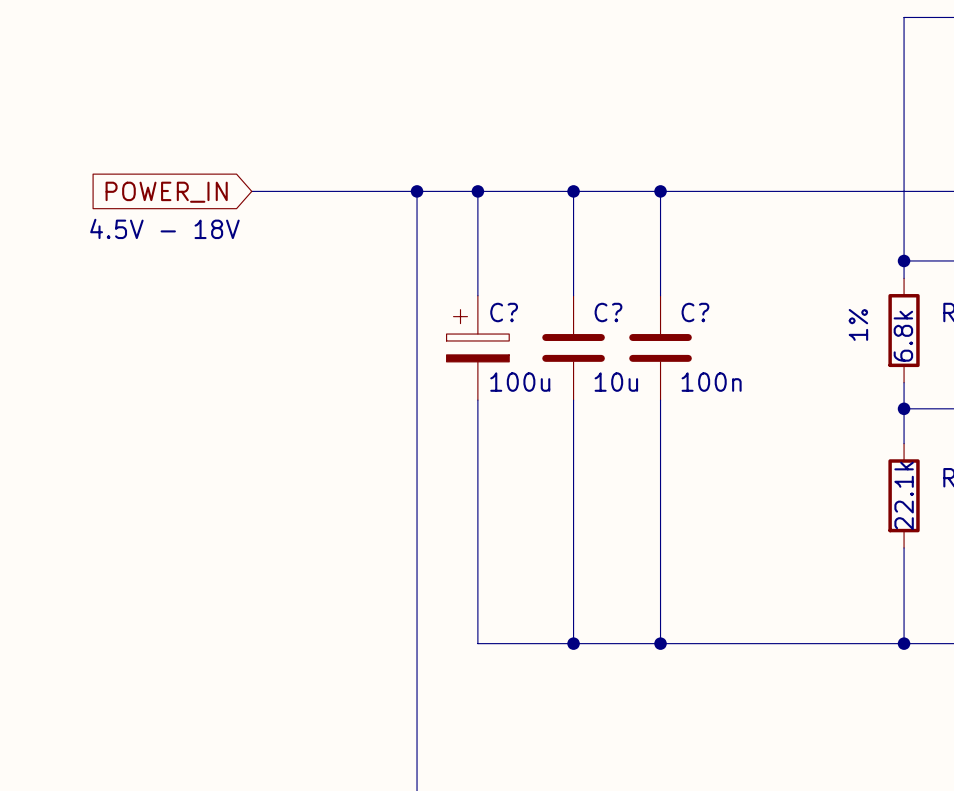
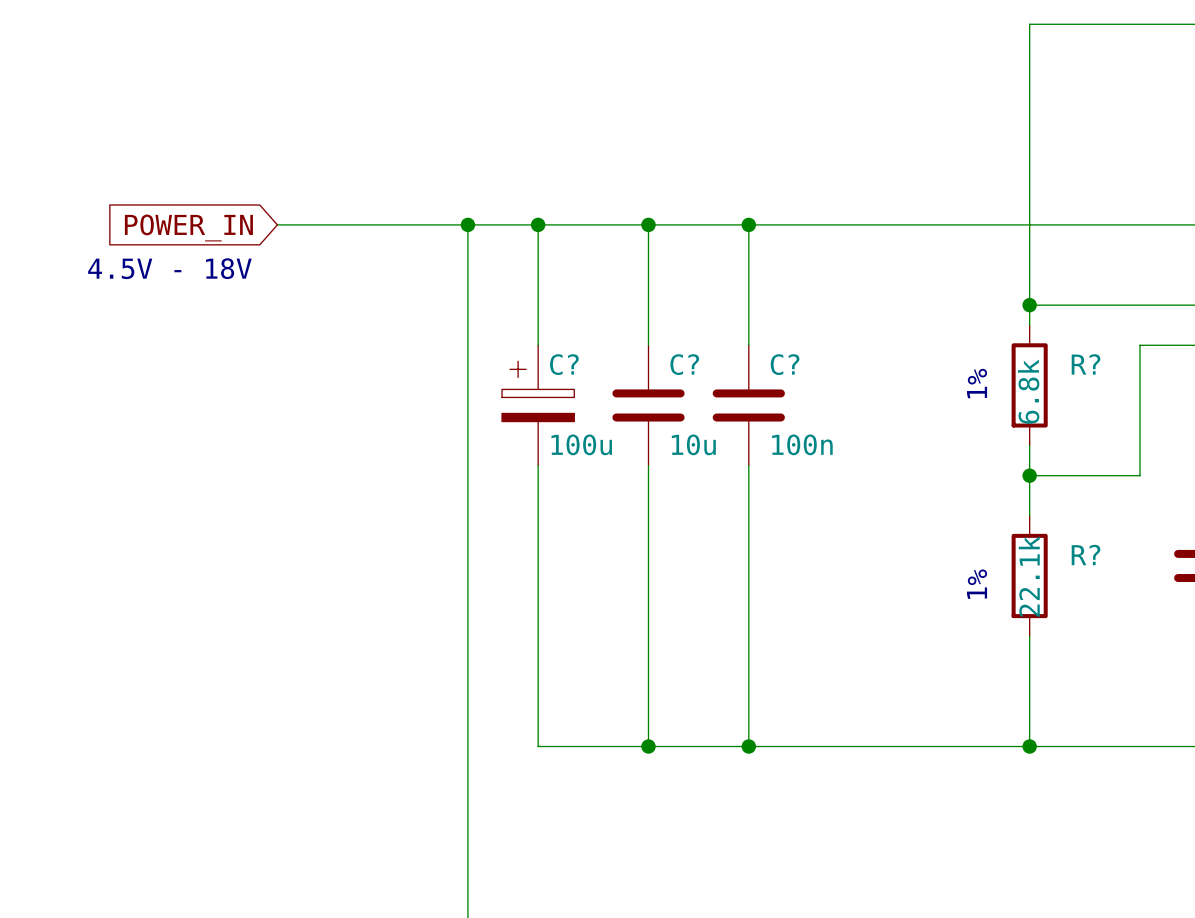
text: none -> 1% (977, 584)

